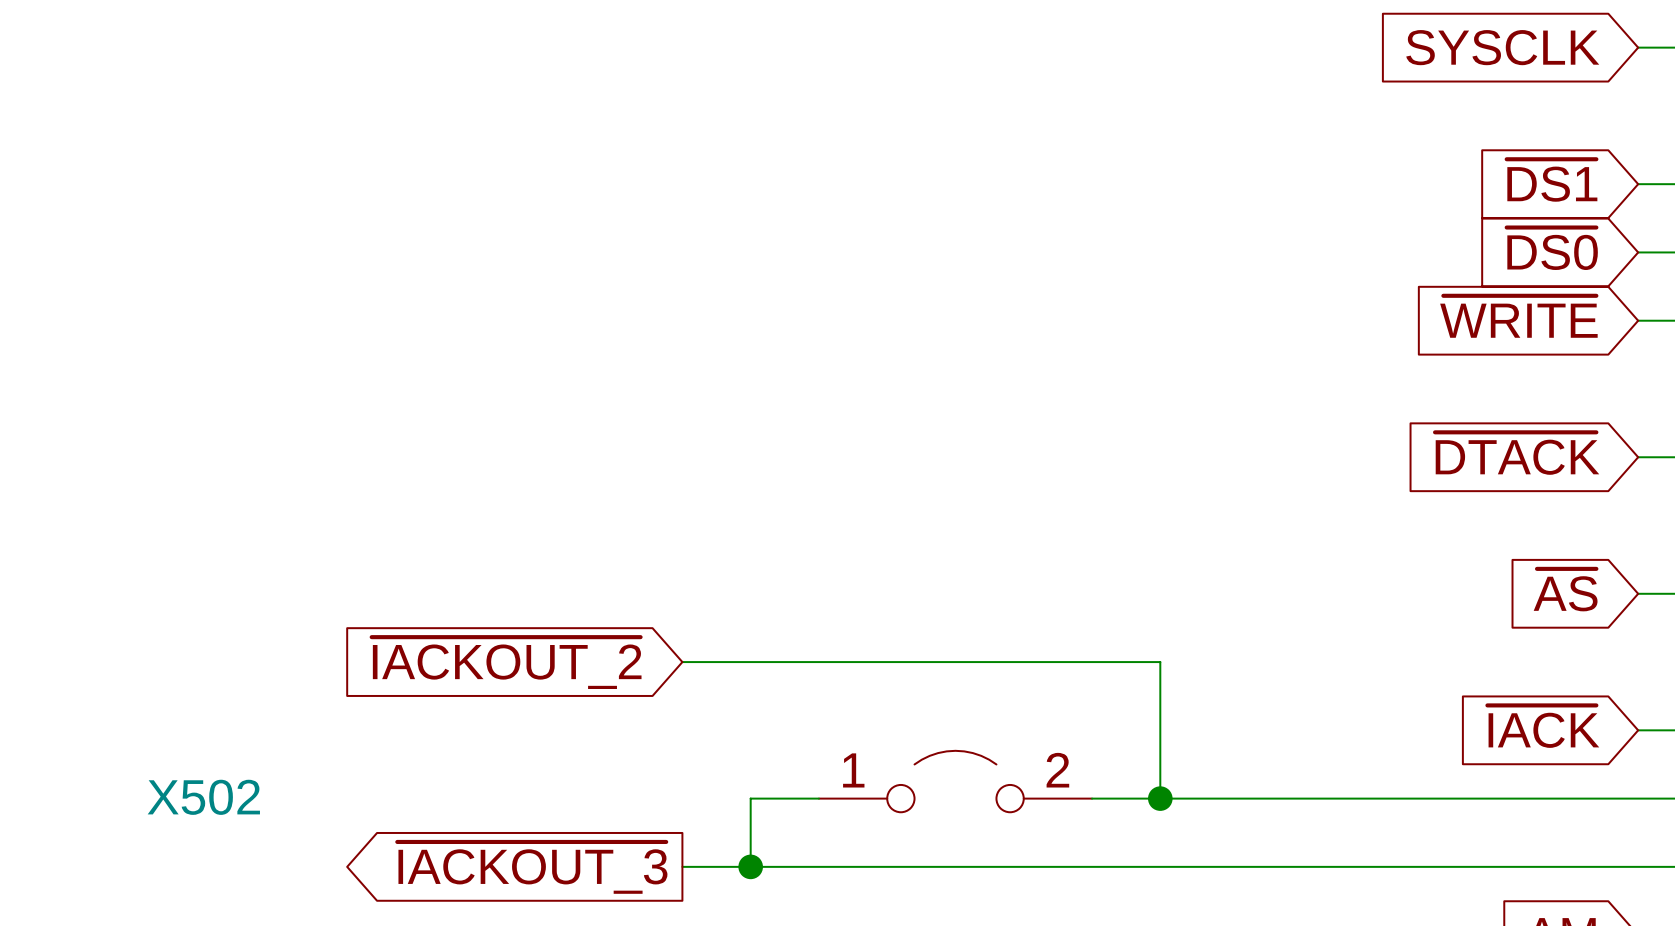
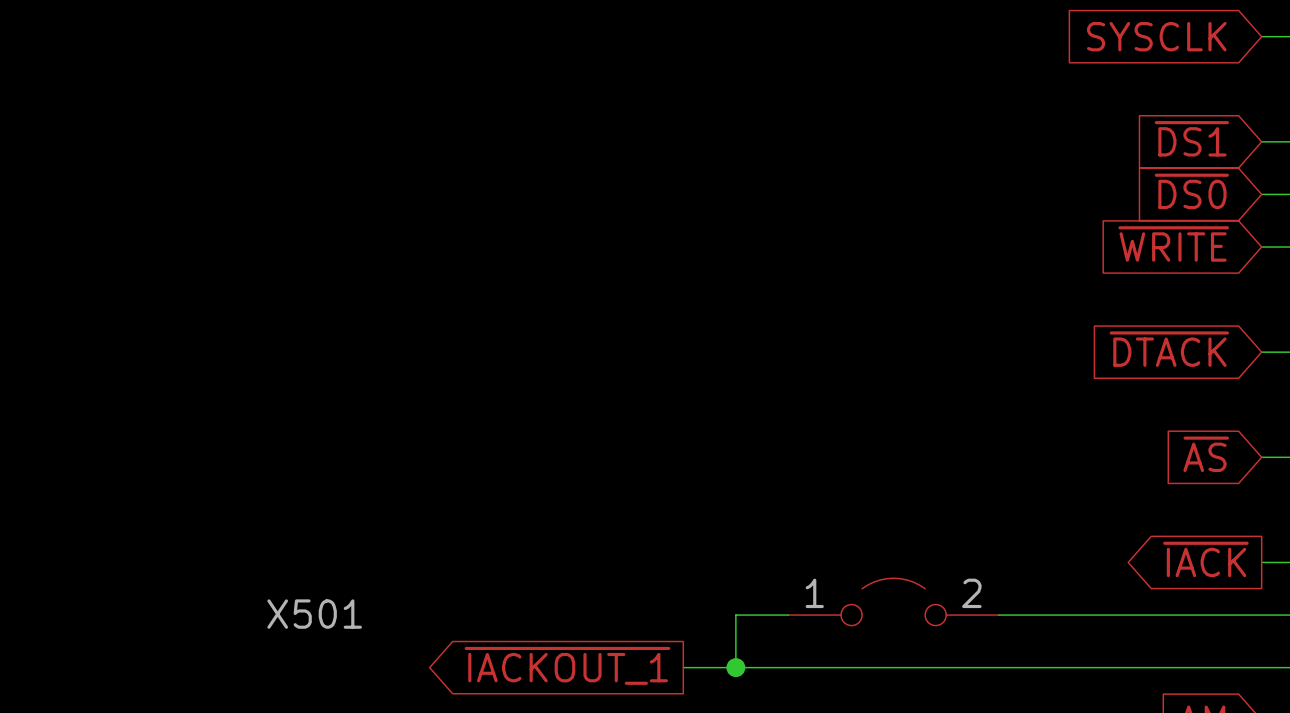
wire: (682, 662) (1160, 662) (1160, 798) -> none
global label: ~{IACKOUT_2} (506, 663) -> none
global label shape: input (1543, 726) -> output (1205, 559)
X502: (955, 781) -> none
X501: none -> (893, 601)
wire: (818, 798) (750, 798) (750, 866) -> (788, 615) (735, 615) (735, 667)
wire: (1092, 798) (1296, 798) -> none
junction: (1160, 798) -> none
wire: (682, 866) (887, 866) -> none
junction: (750, 866) -> none
junction: none -> (735, 667)
global label: ~{IACKOUT_3} (532, 867) -> ~{IACKOUT_1} (567, 665)

